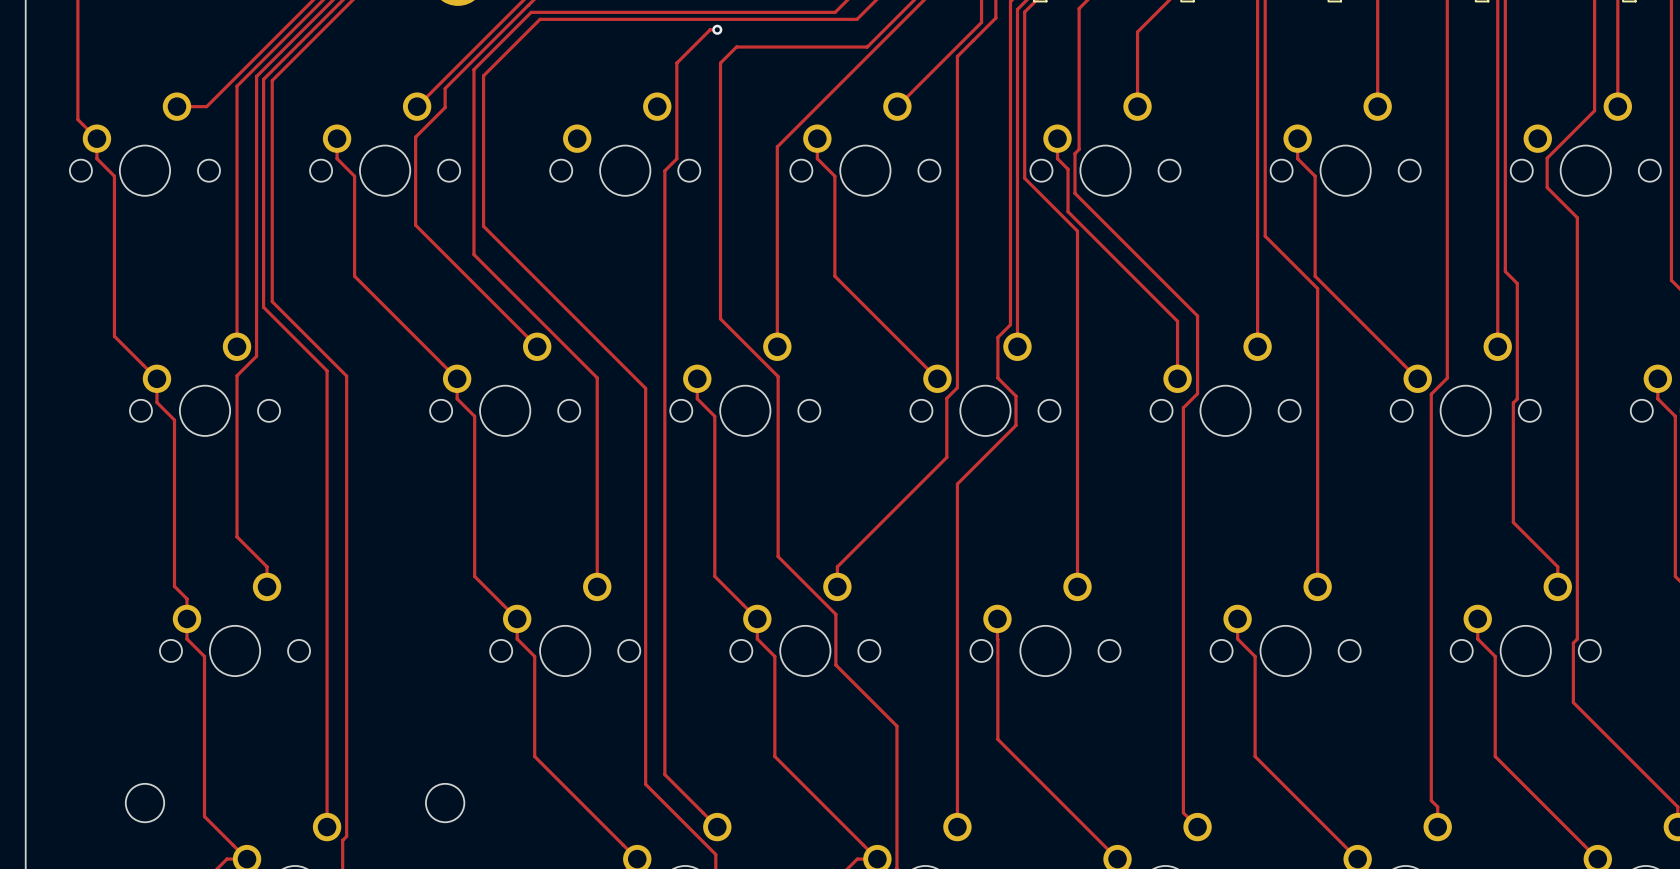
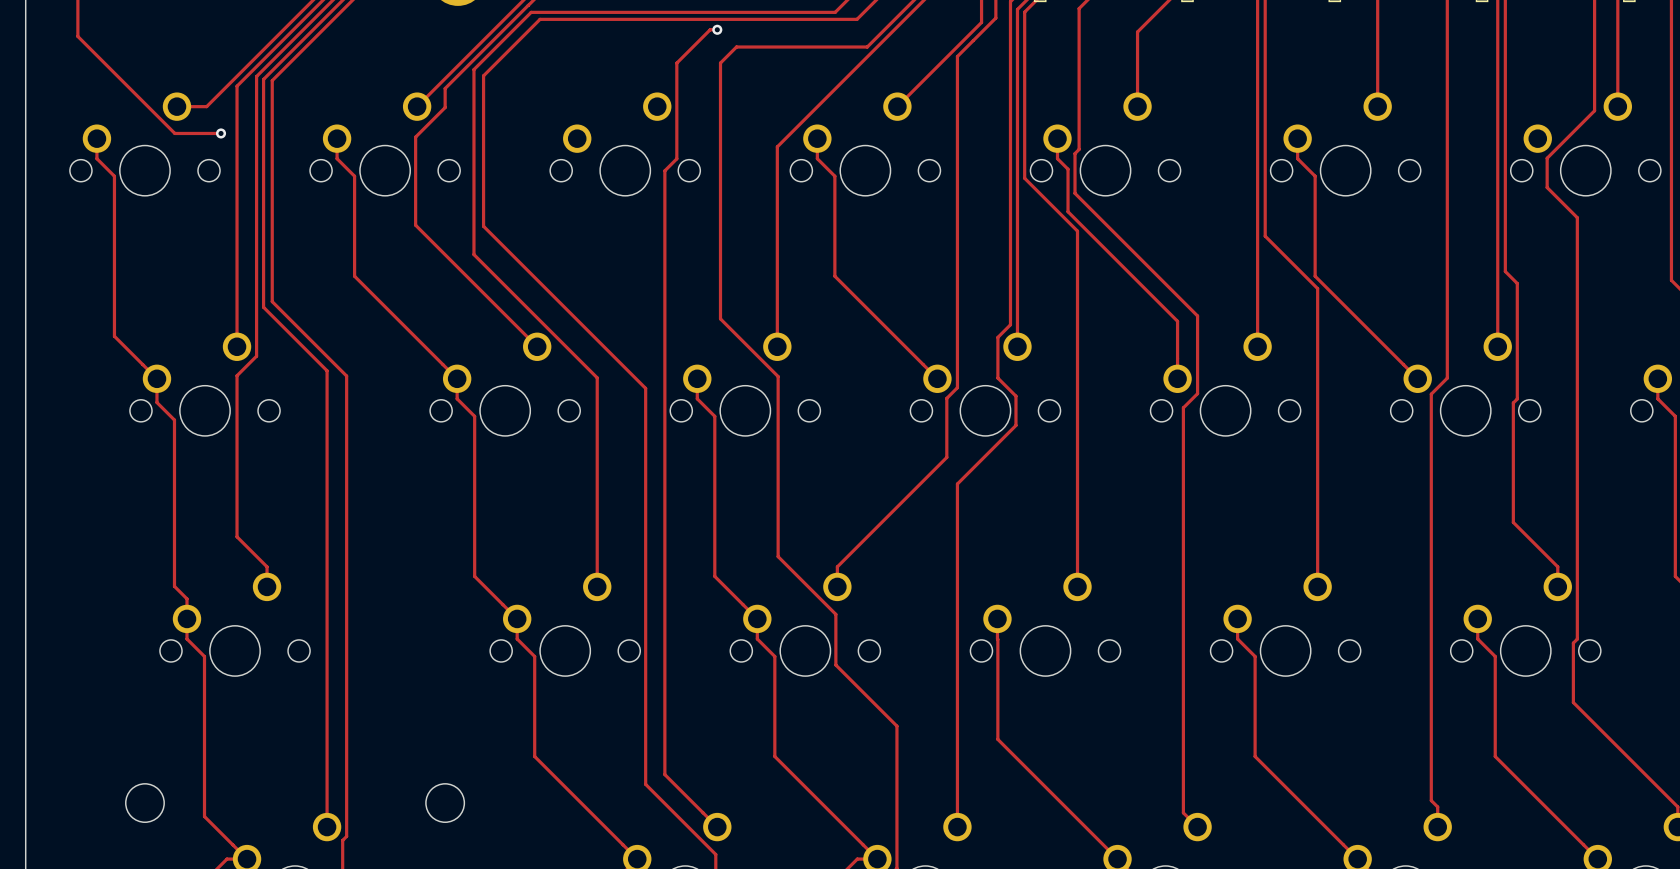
track: (77, 36) (77, 119) (96, 138) -> (77, 36) (174, 133) (221, 133)
via: none -> (221, 133)

